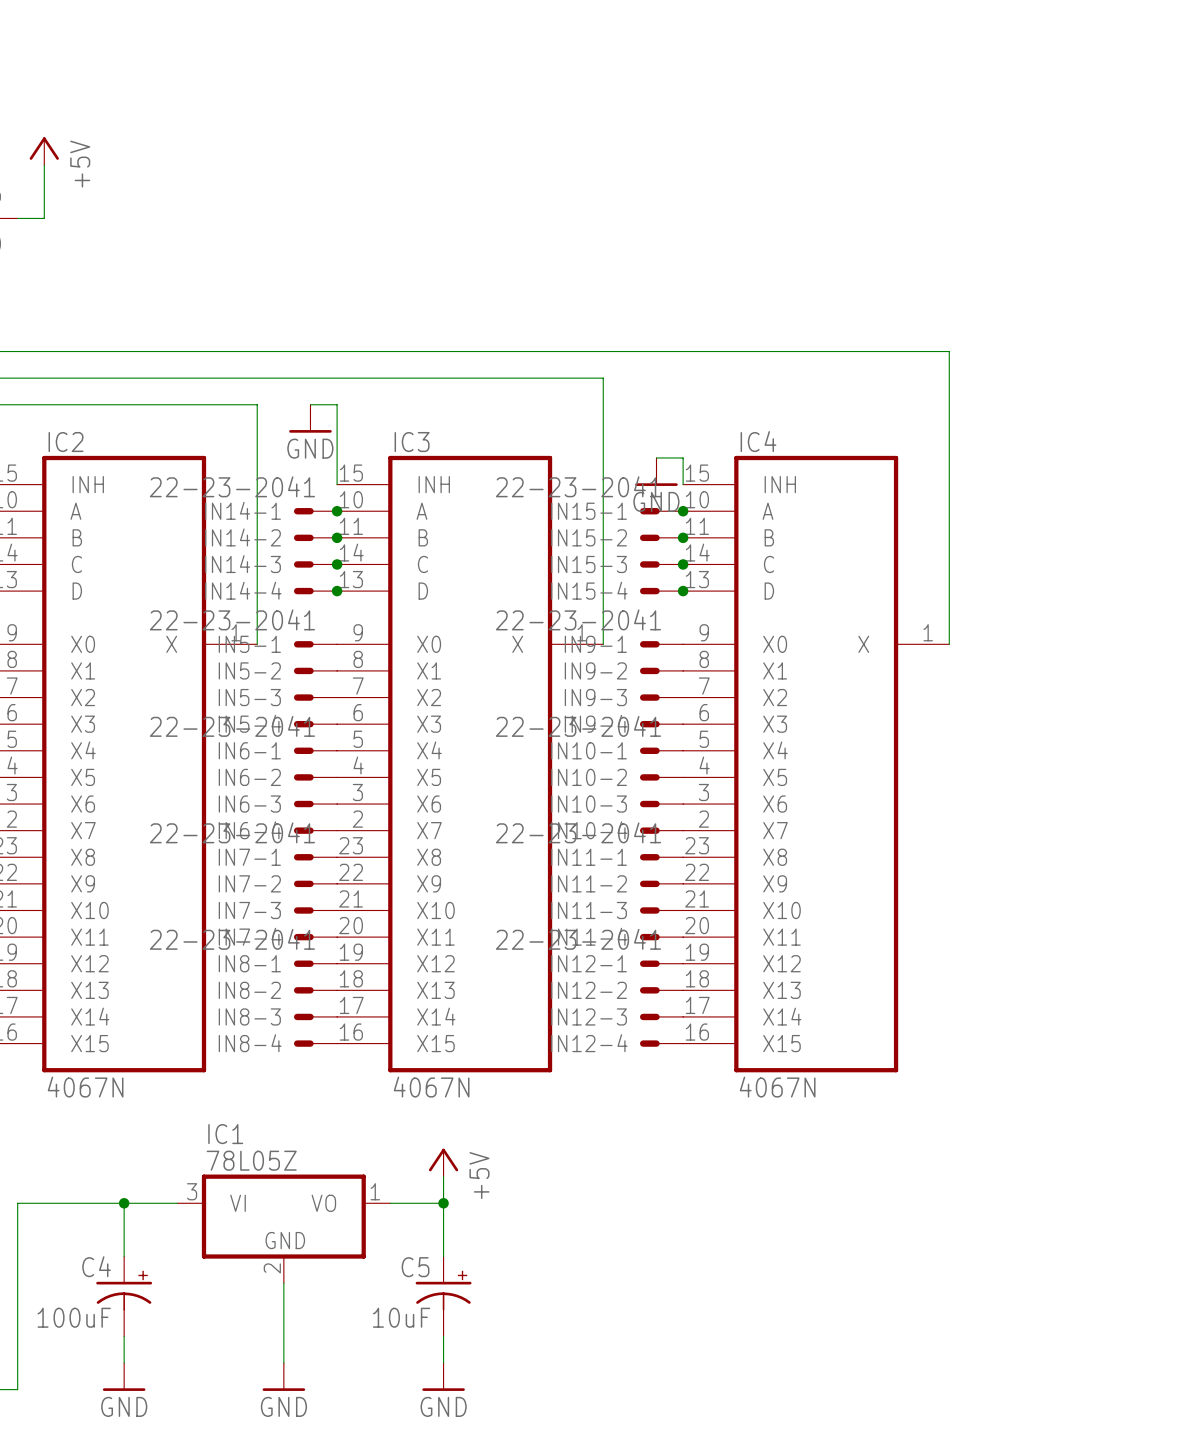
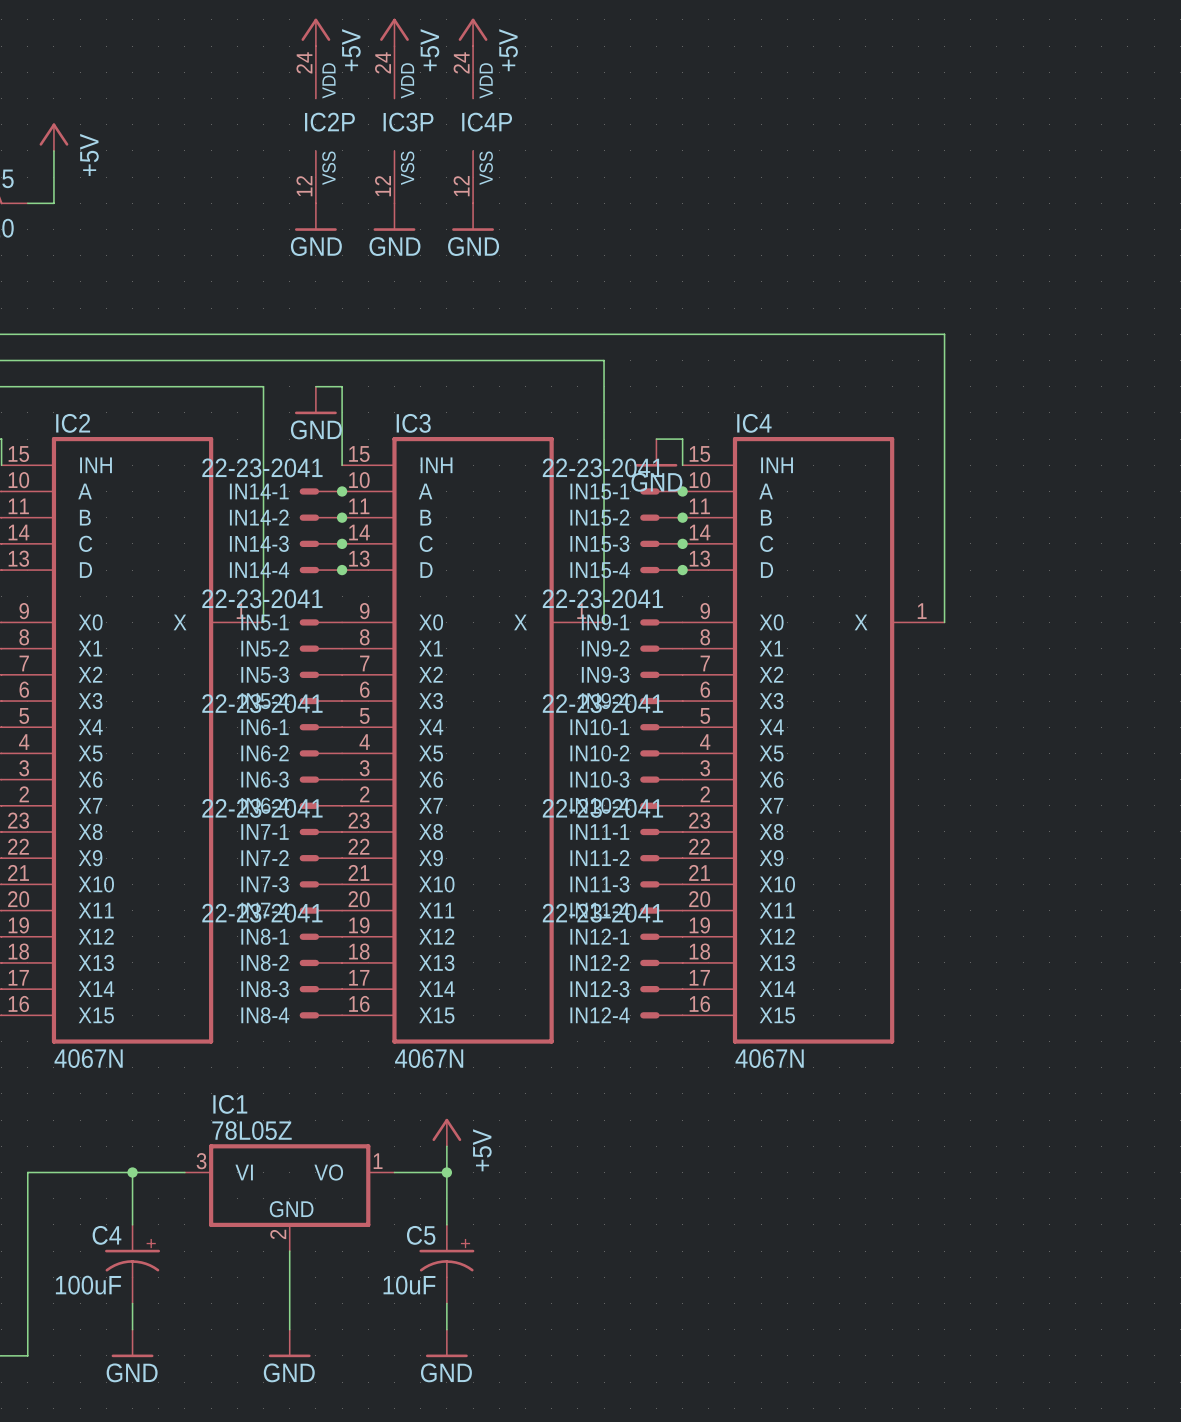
power symbol: none -> +5V (315, 32)
power symbol: none -> +5V (394, 32)
power symbol: none -> +5V (473, 32)
IC2P: none -> (315, 124)
IC3P: none -> (394, 124)
IC4P: none -> (473, 124)
power symbol: none -> GND (315, 217)
power symbol: none -> GND (394, 217)
power symbol: none -> GND (473, 217)

